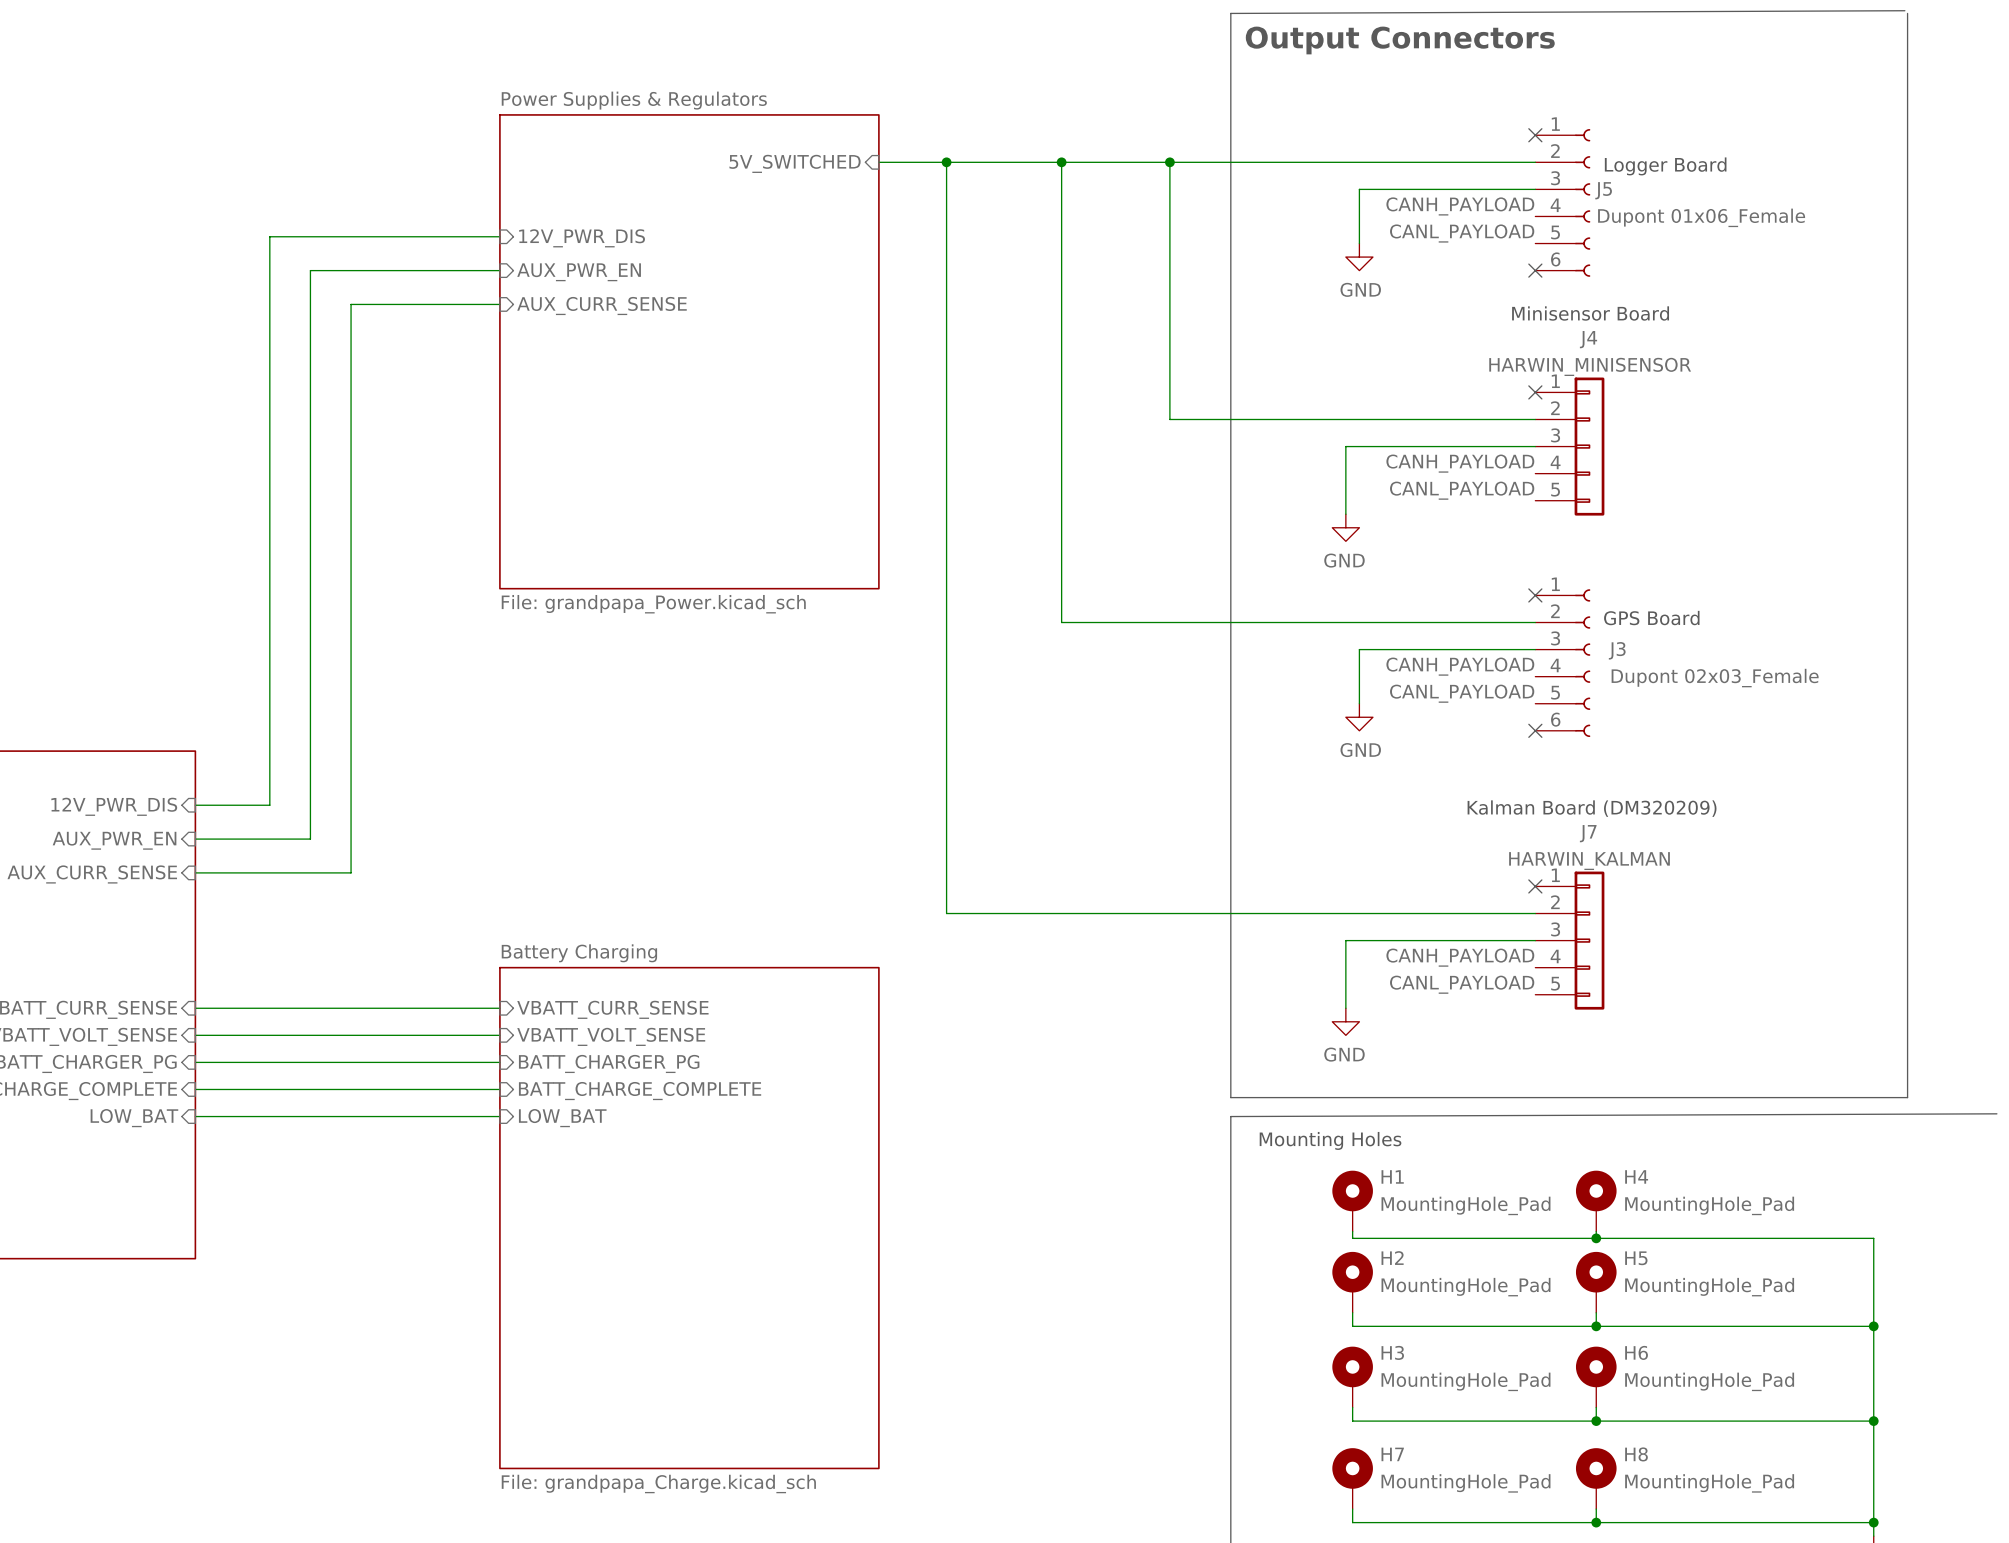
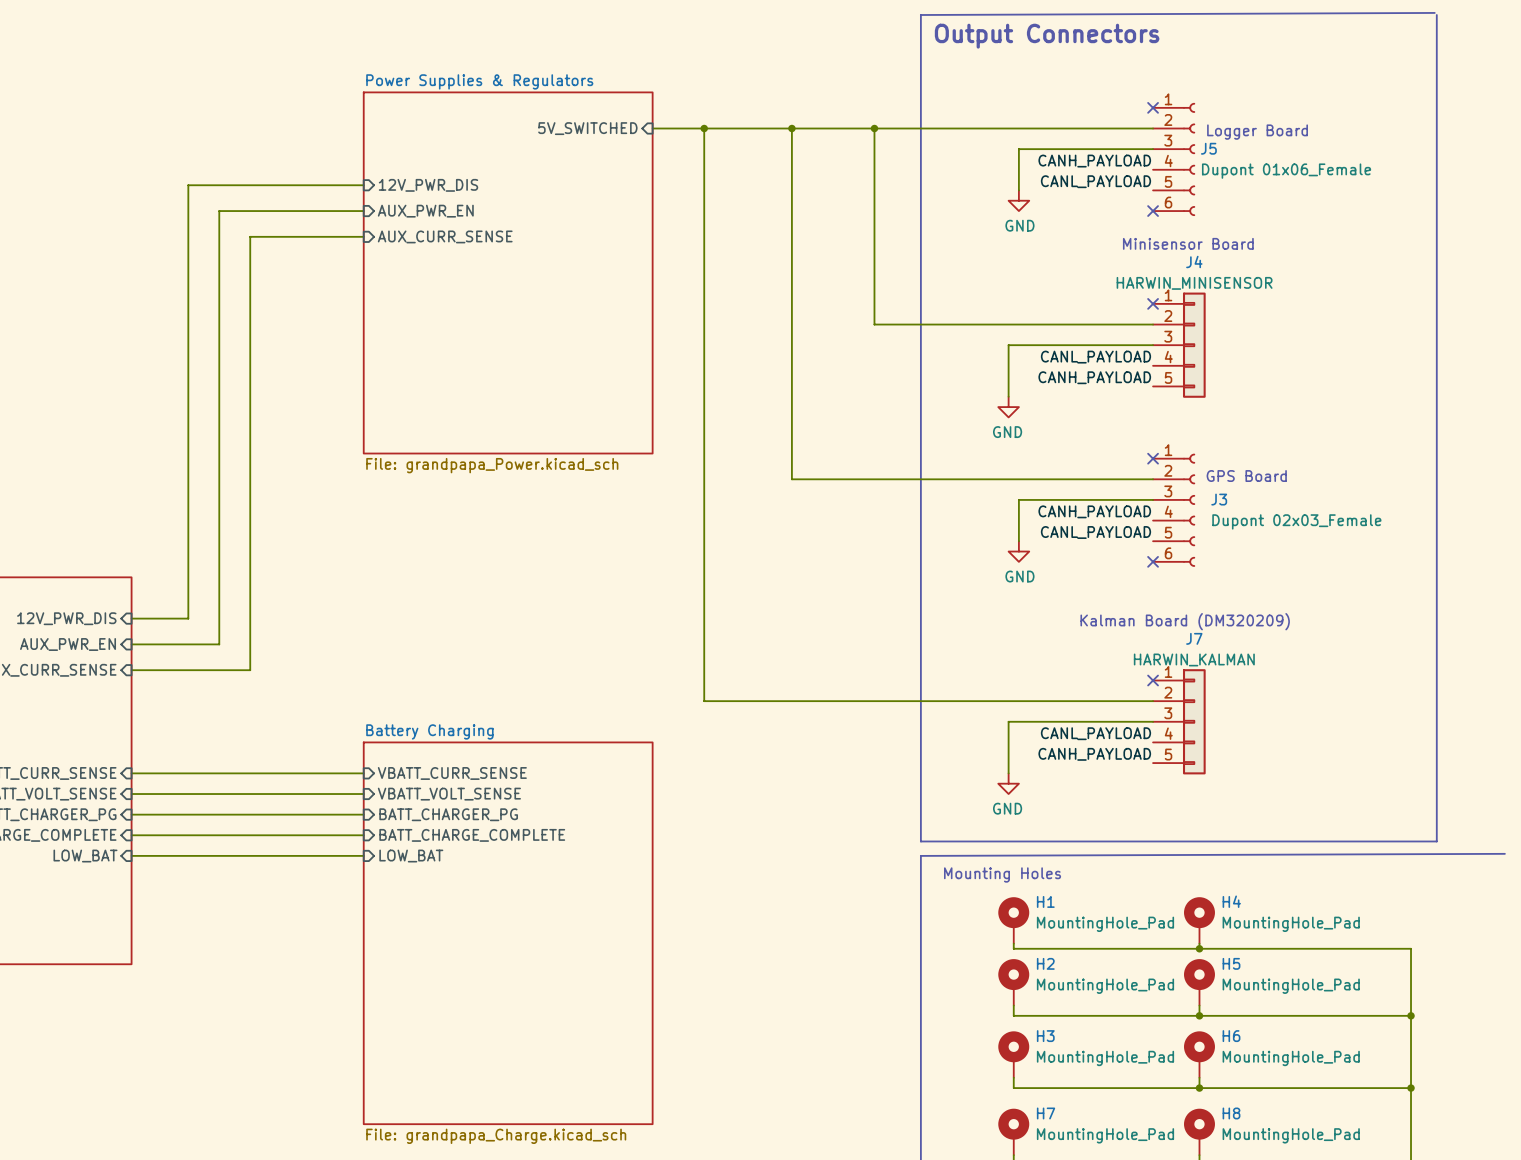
label: CANH_PAYLOAD (1460, 463) -> CANL_PAYLOAD (1095, 357)
label: CANL_PAYLOAD (1462, 490) -> CANH_PAYLOAD (1094, 377)
label: CANH_PAYLOAD (1460, 957) -> CANL_PAYLOAD (1095, 733)
label: CANL_PAYLOAD (1462, 984) -> CANH_PAYLOAD (1094, 754)

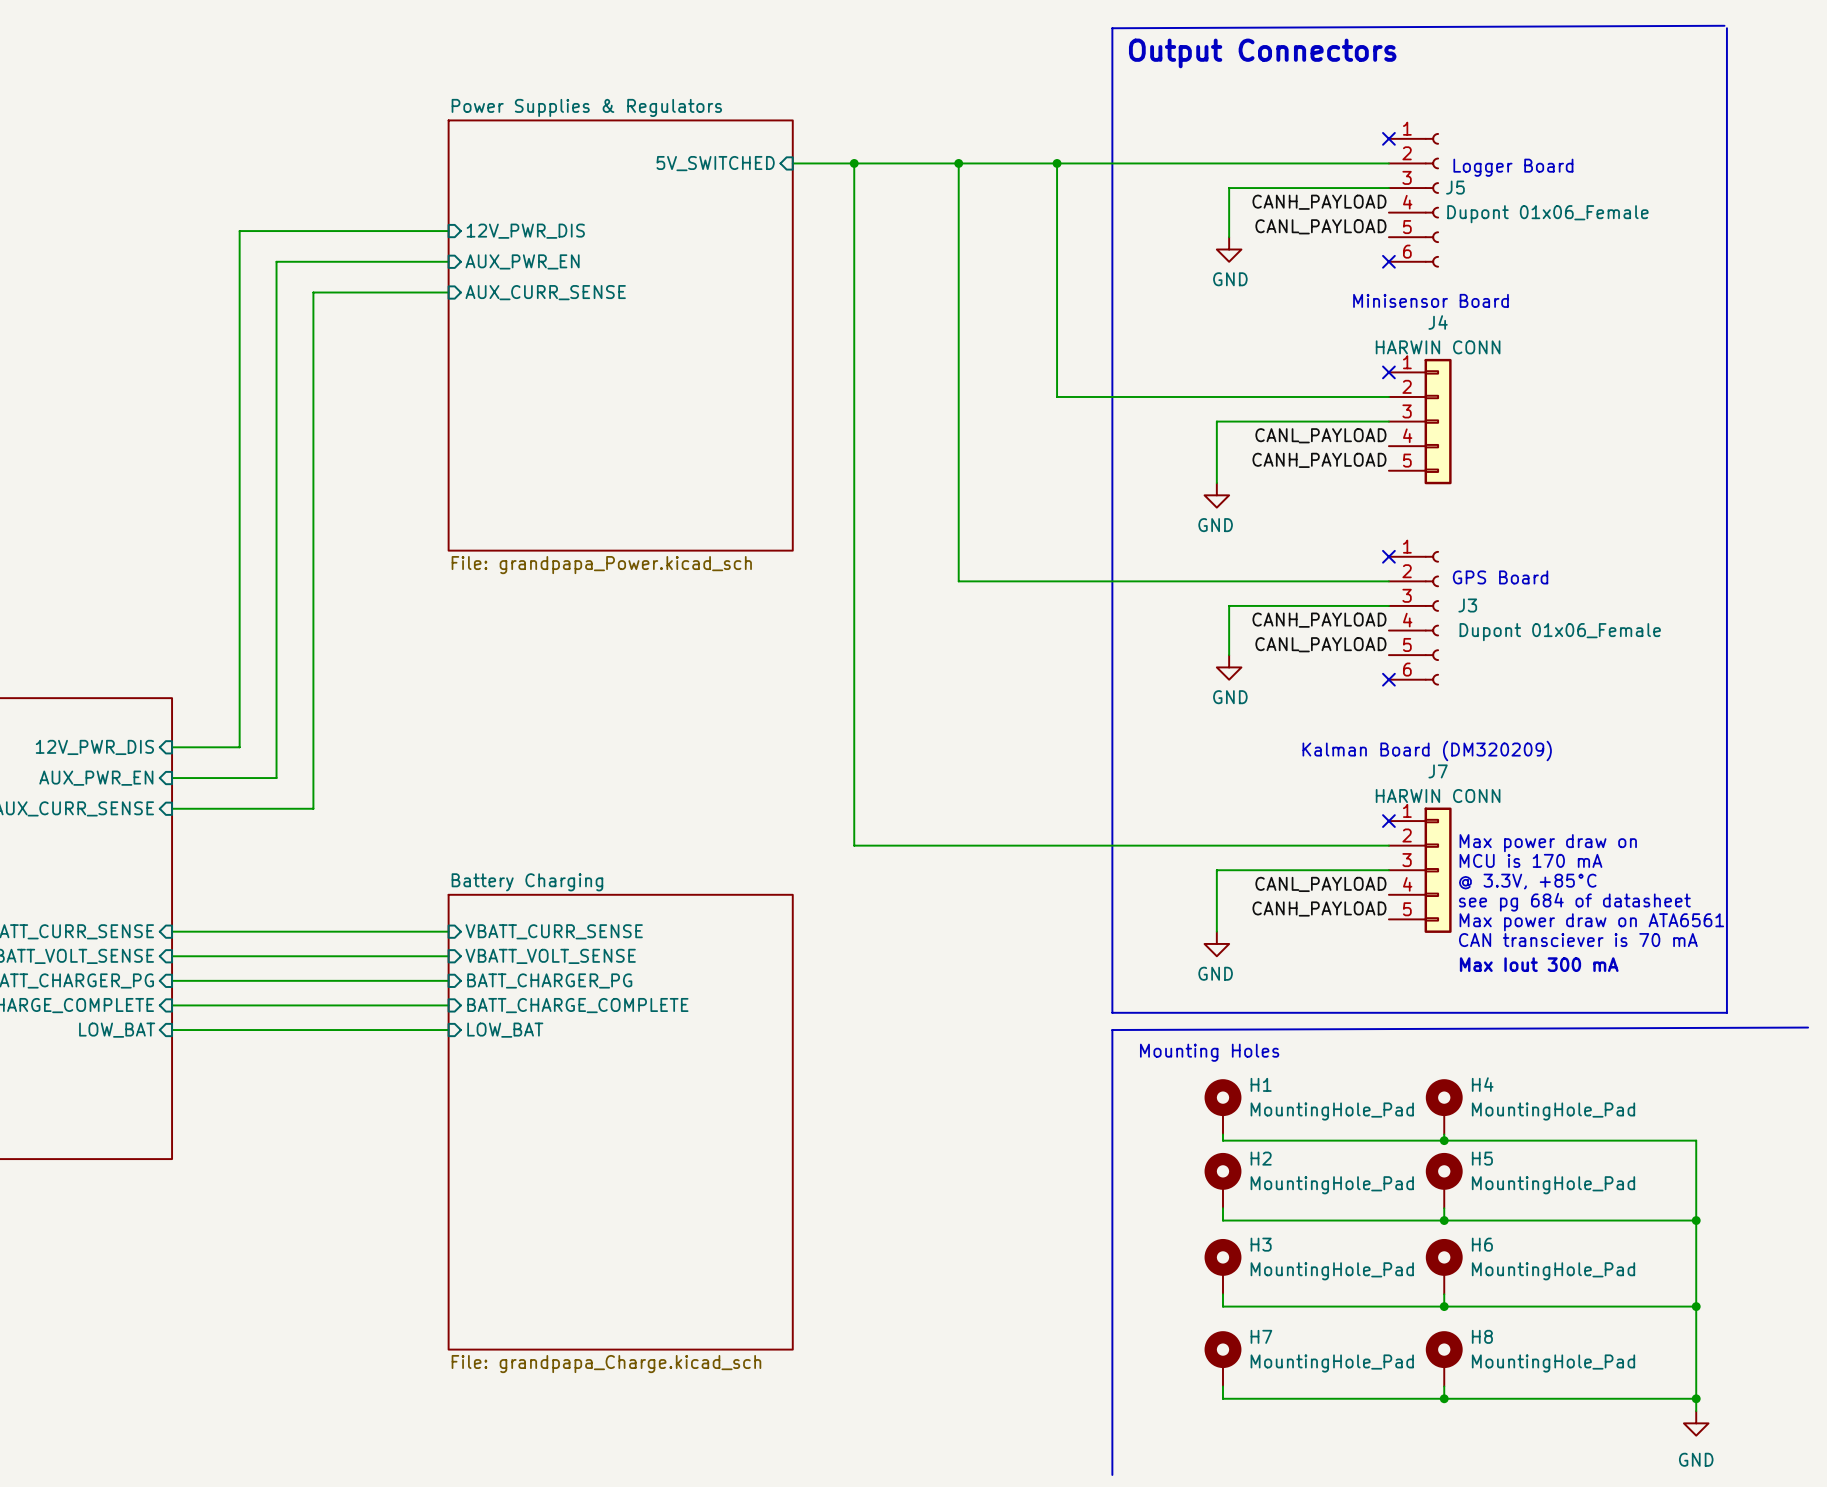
J4 value: HARWIN_MINISENSOR (1194, 283) -> HARWIN CONN (1438, 347)
J3 value: Dupont 02x03_Female (1296, 521) -> Dupont 01x06_Female (1560, 632)
J7 value: HARWIN_KALMAN (1194, 659) -> HARWIN CONN (1438, 796)
text: none -> Max power draw on (1548, 843)
text: none -> MCU is 170 mA (1530, 860)
text: none -> @ 3.3V, +85°C (1527, 881)
text: none -> see pg 684 of datasheet (1574, 902)
text: none -> Max power draw on ATA6561 (1591, 922)
text: none -> CAN transciever is 70 mA (1578, 940)
text: none -> Max Iout 300 mA (1539, 964)

